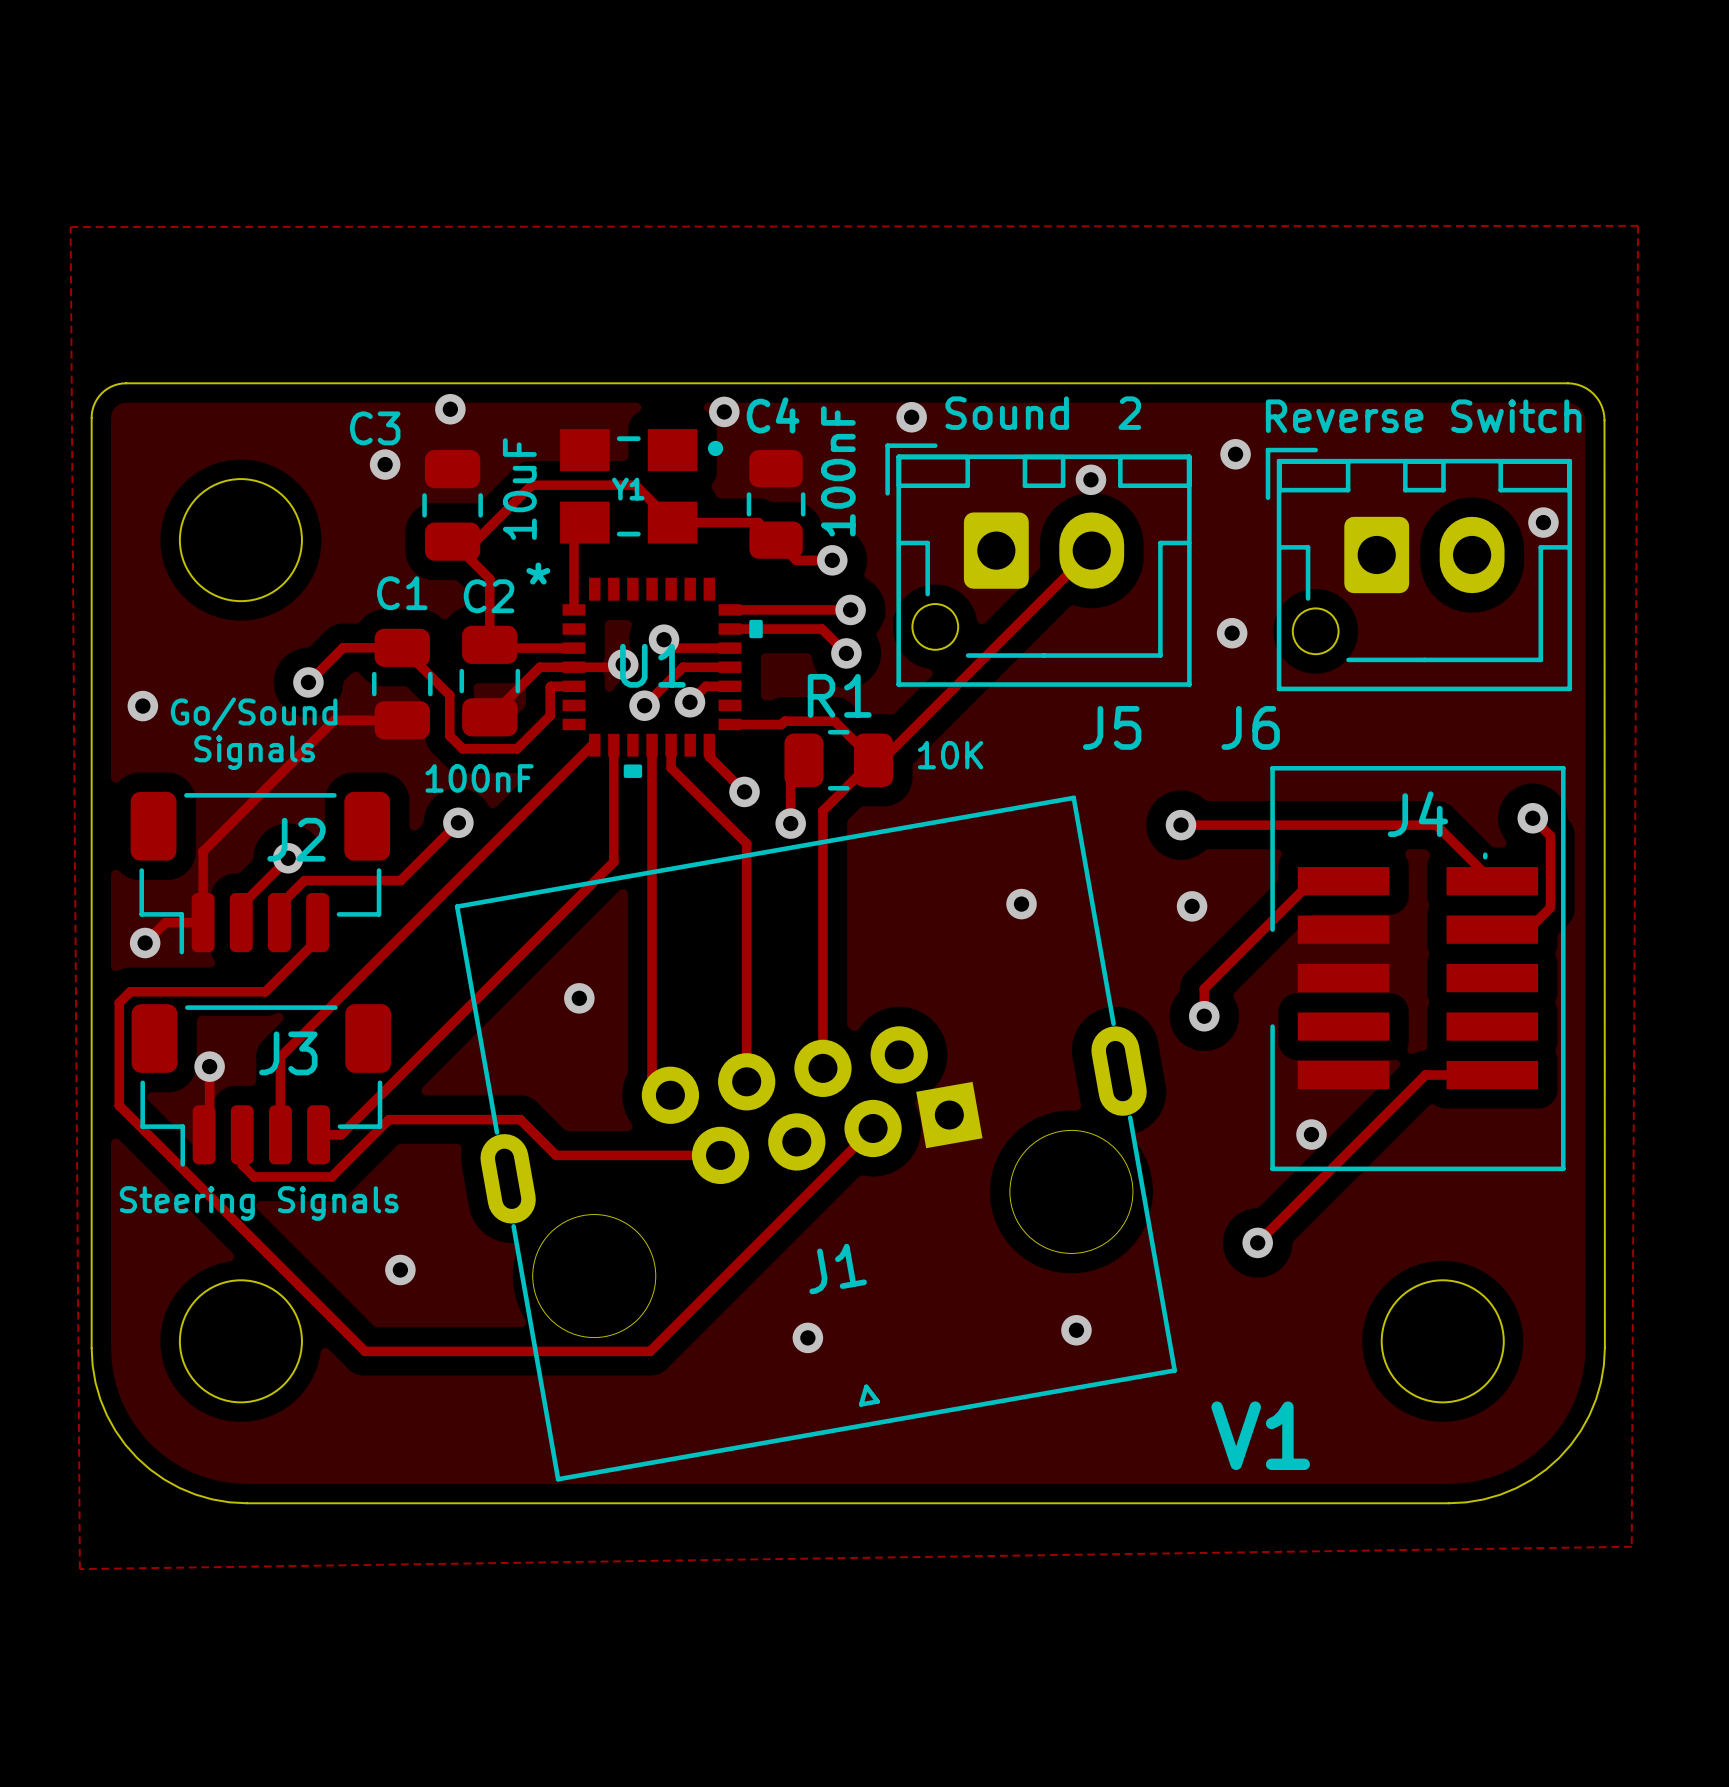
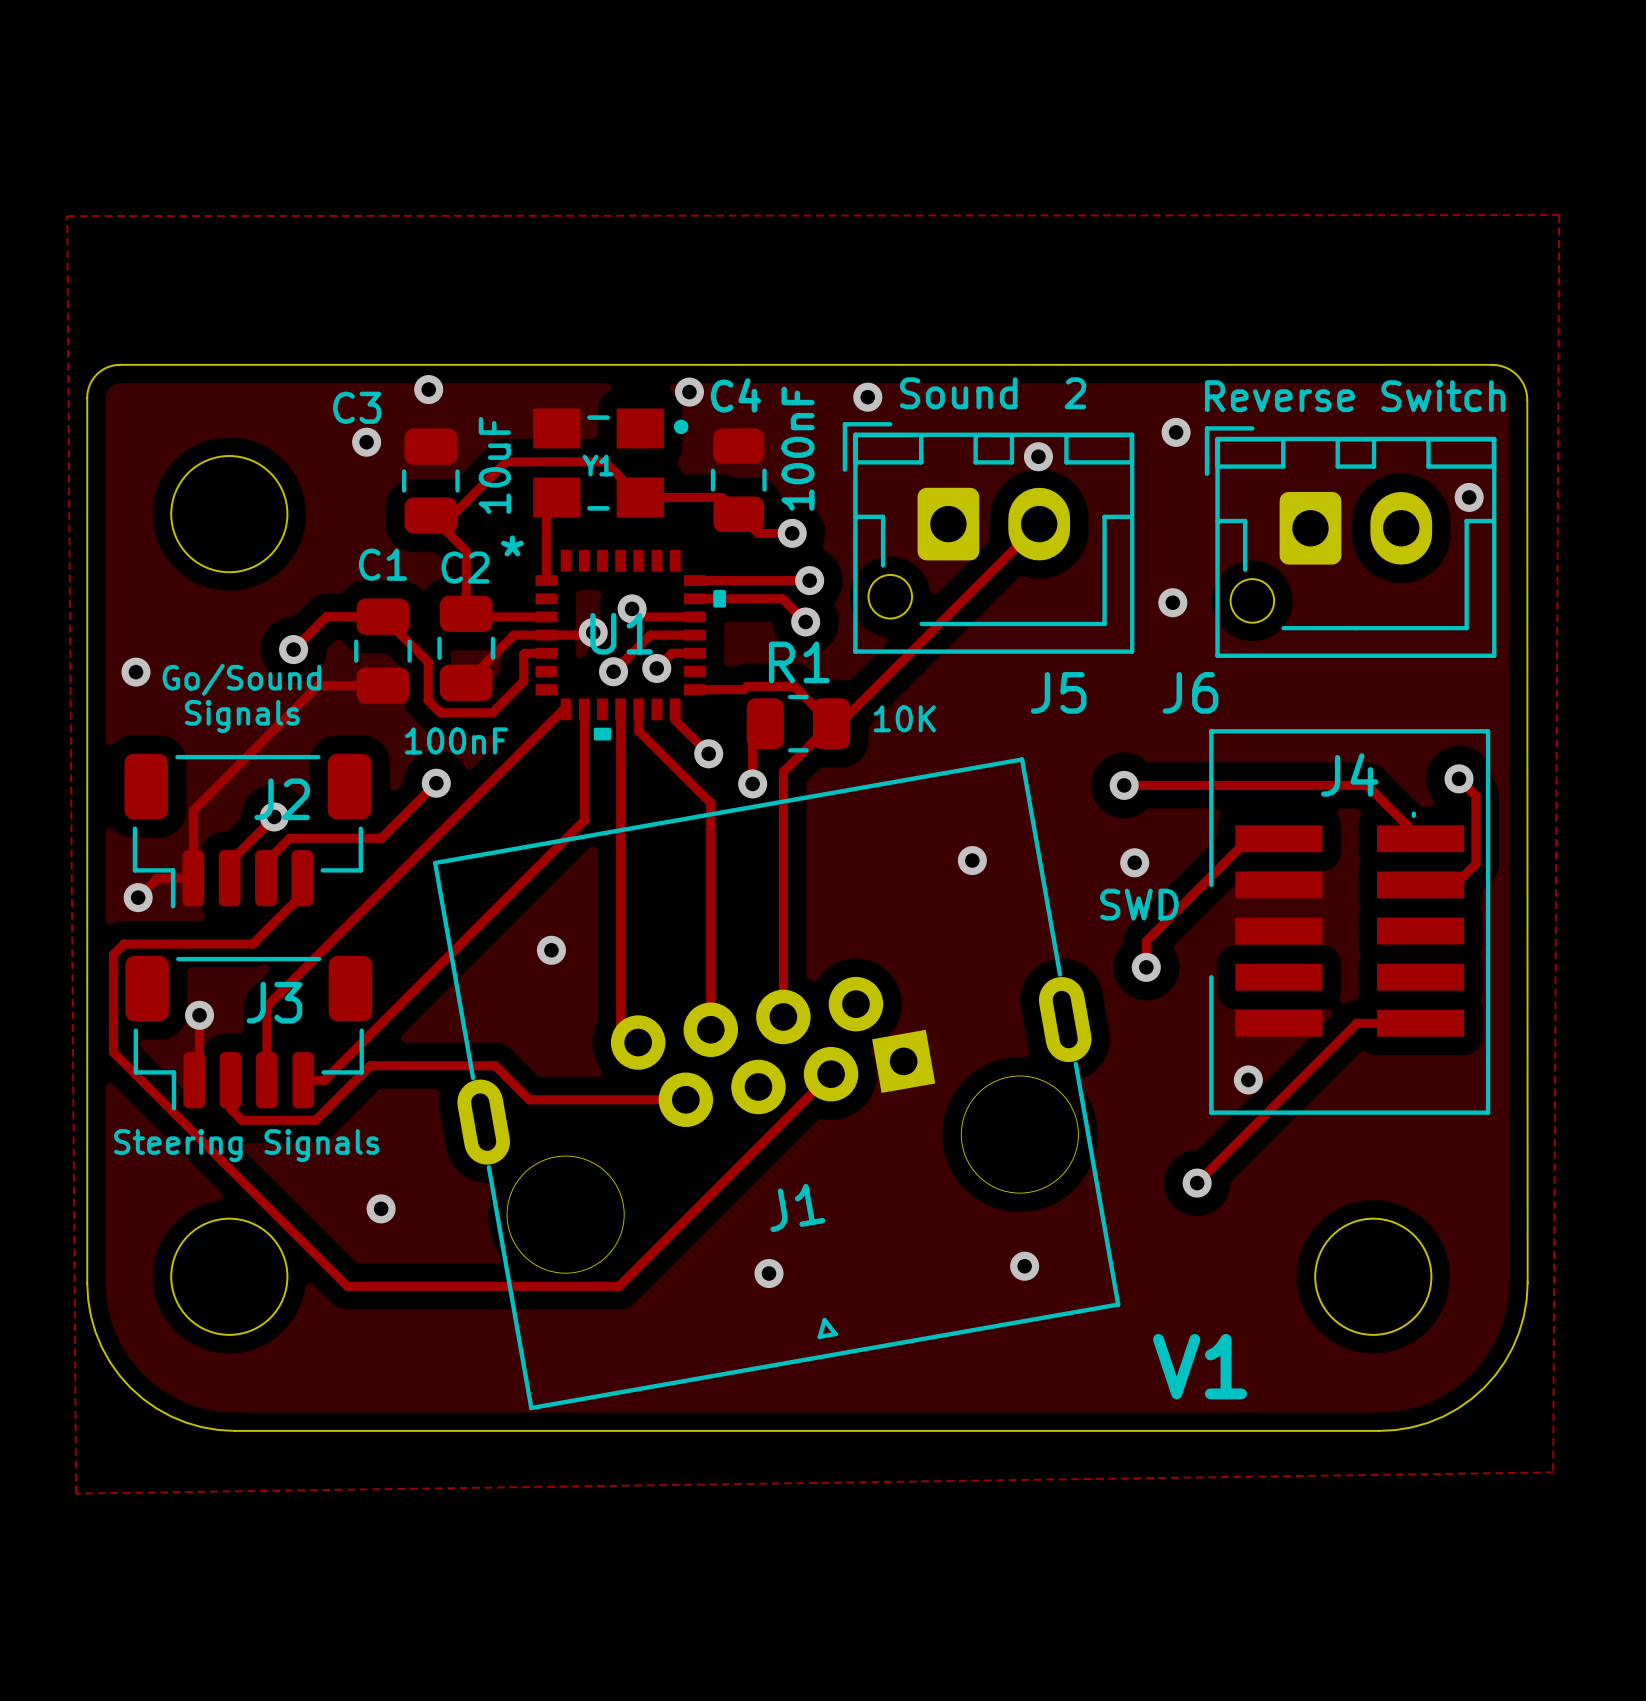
text: none -> SWD (1139, 904)

